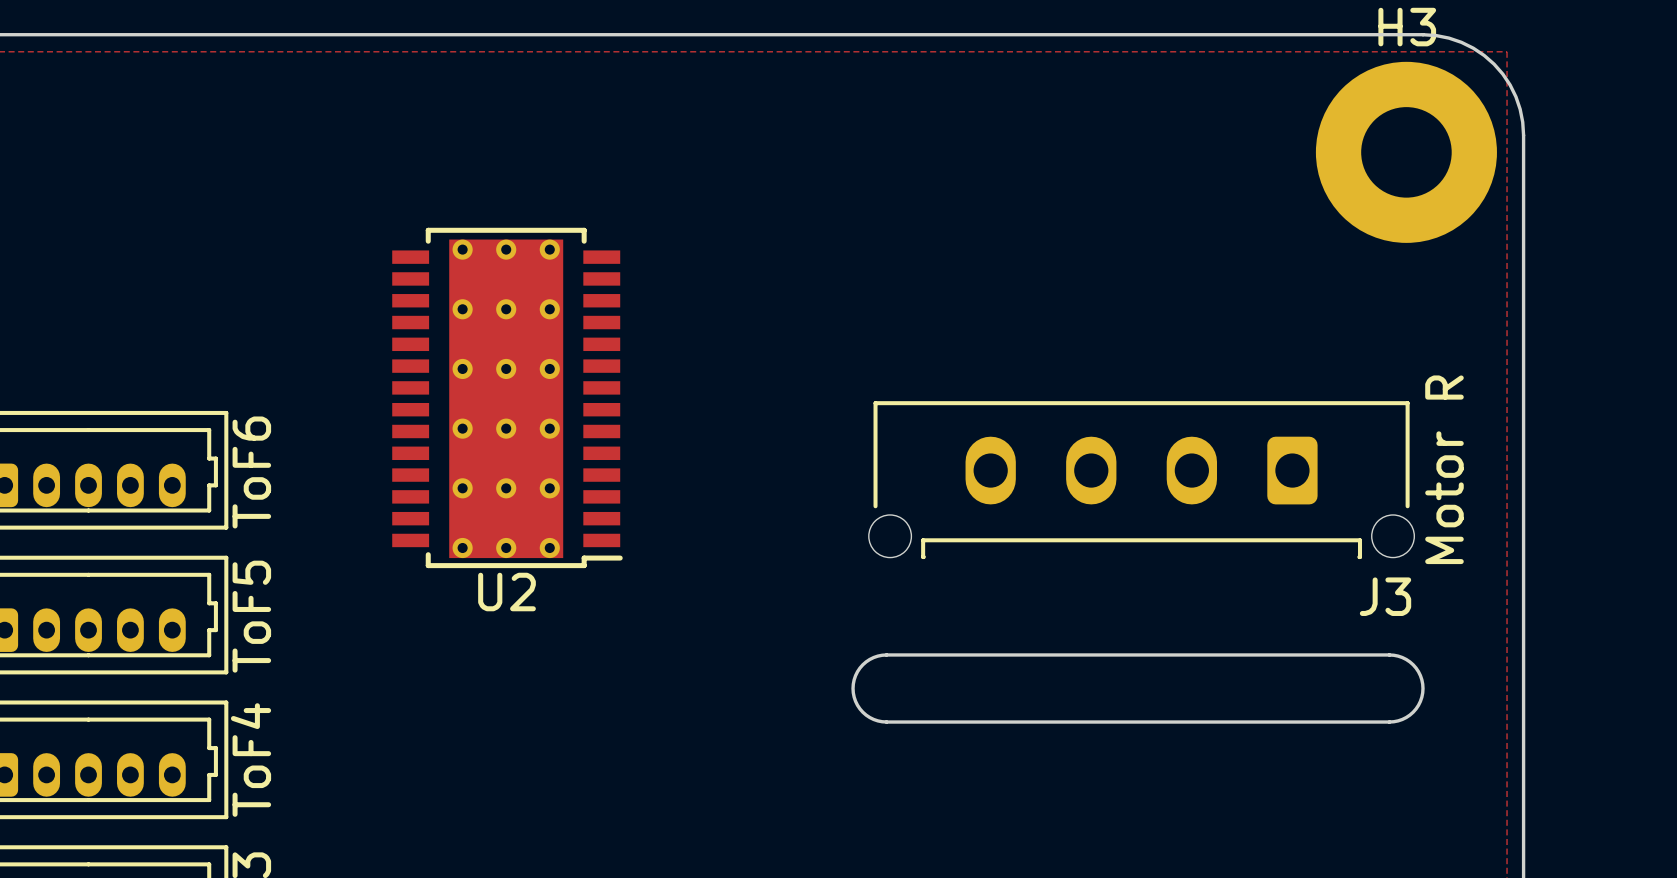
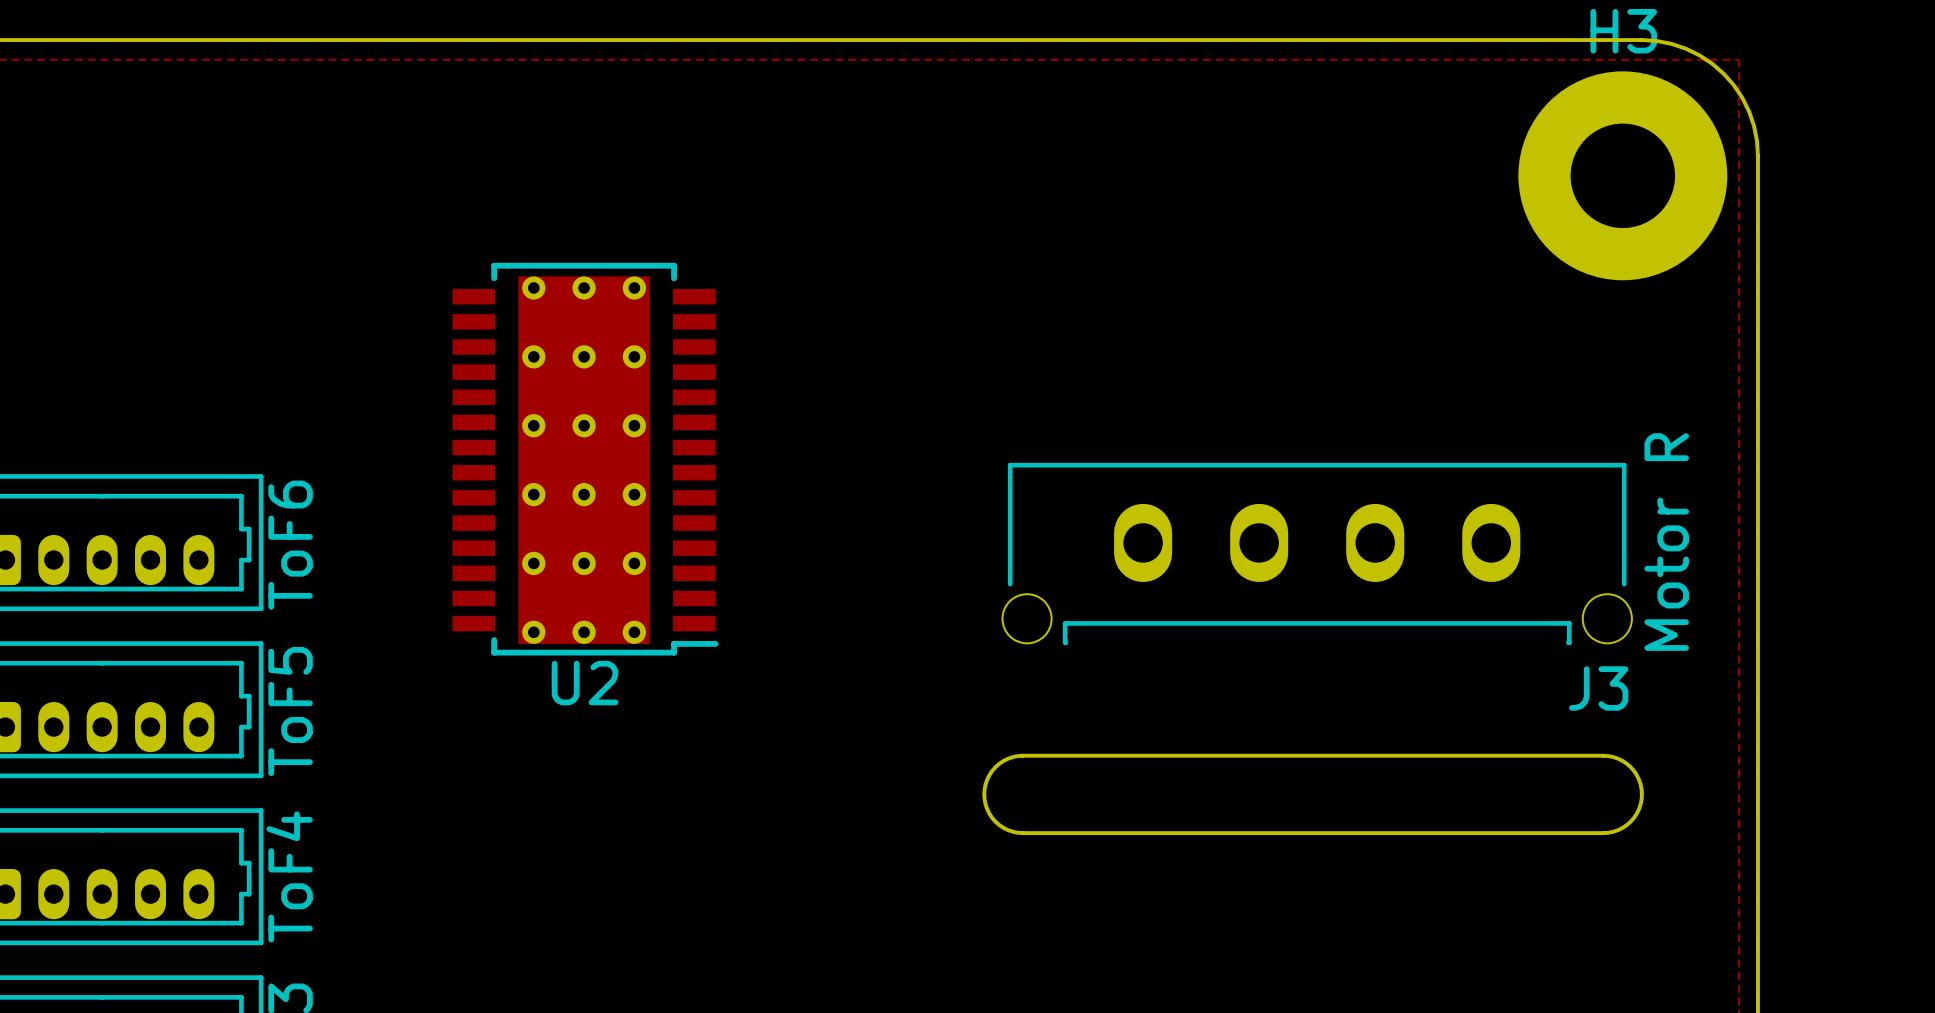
J3 footprint: [868, 401, 1415, 560] -> [1002, 462, 1632, 646]

